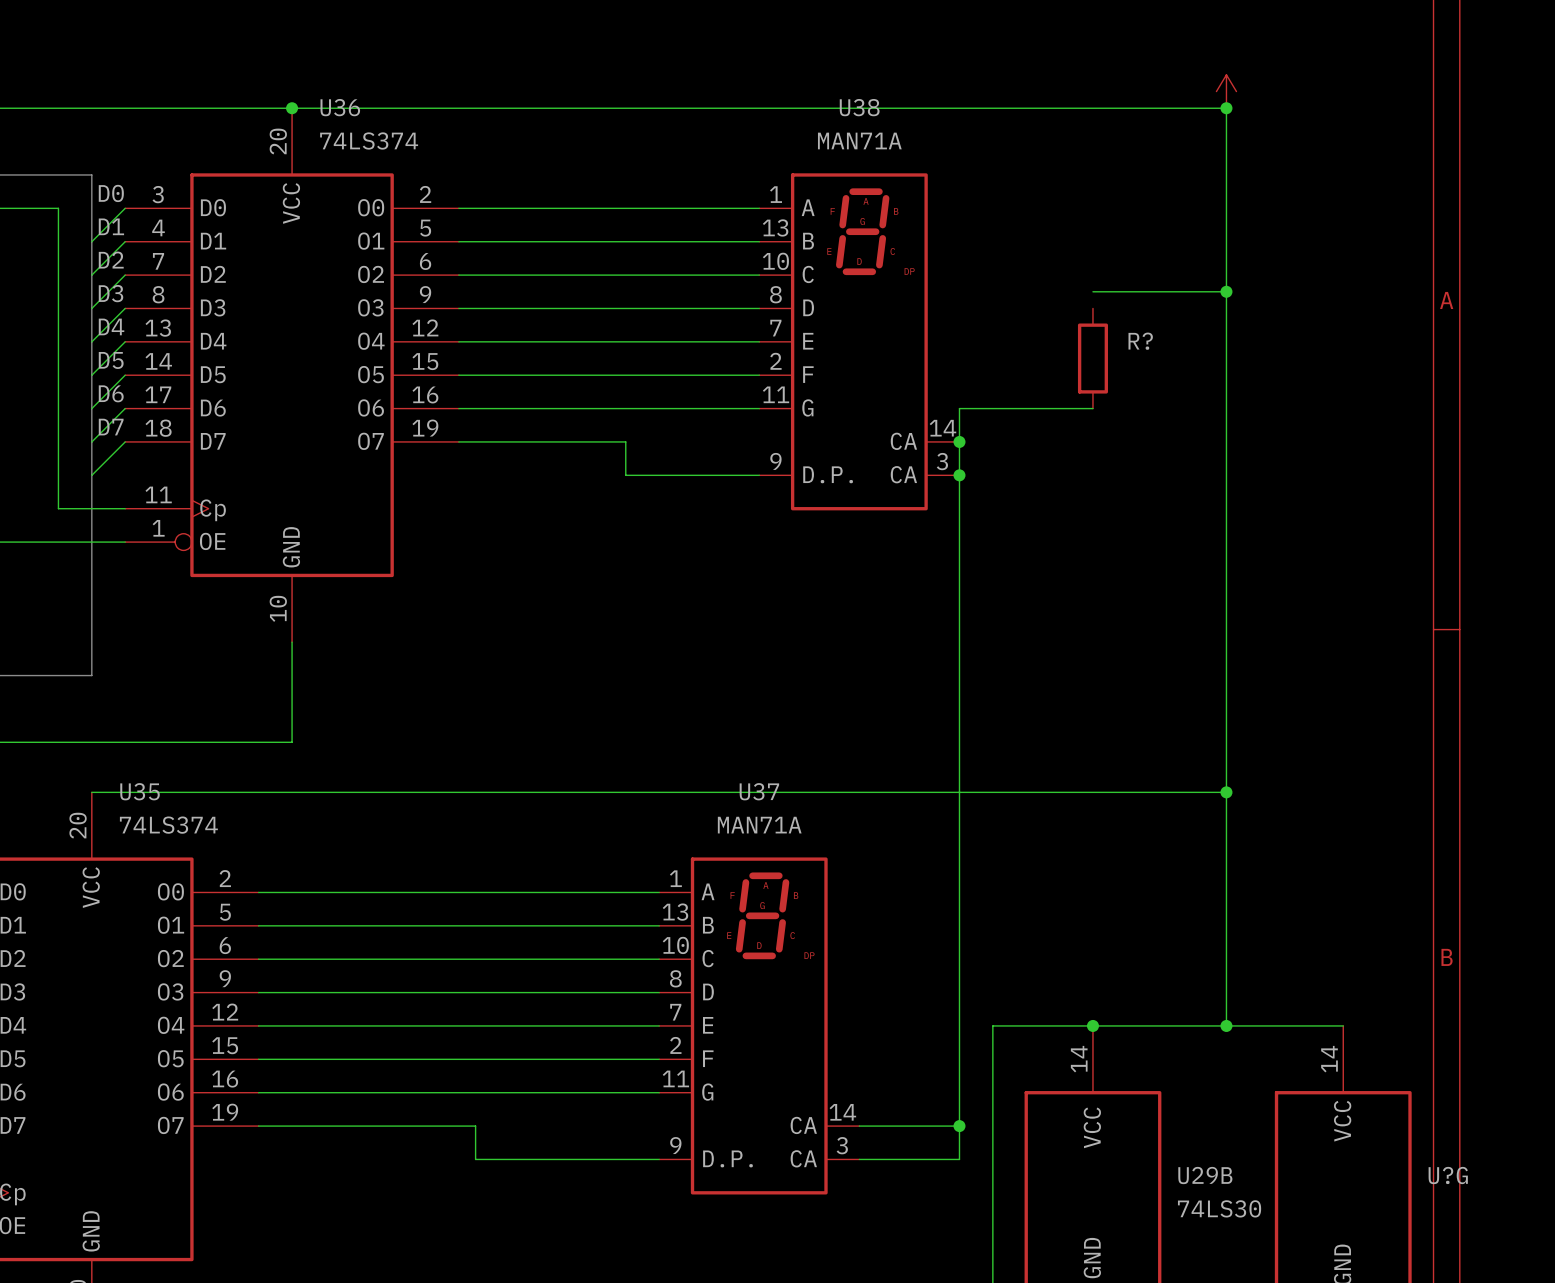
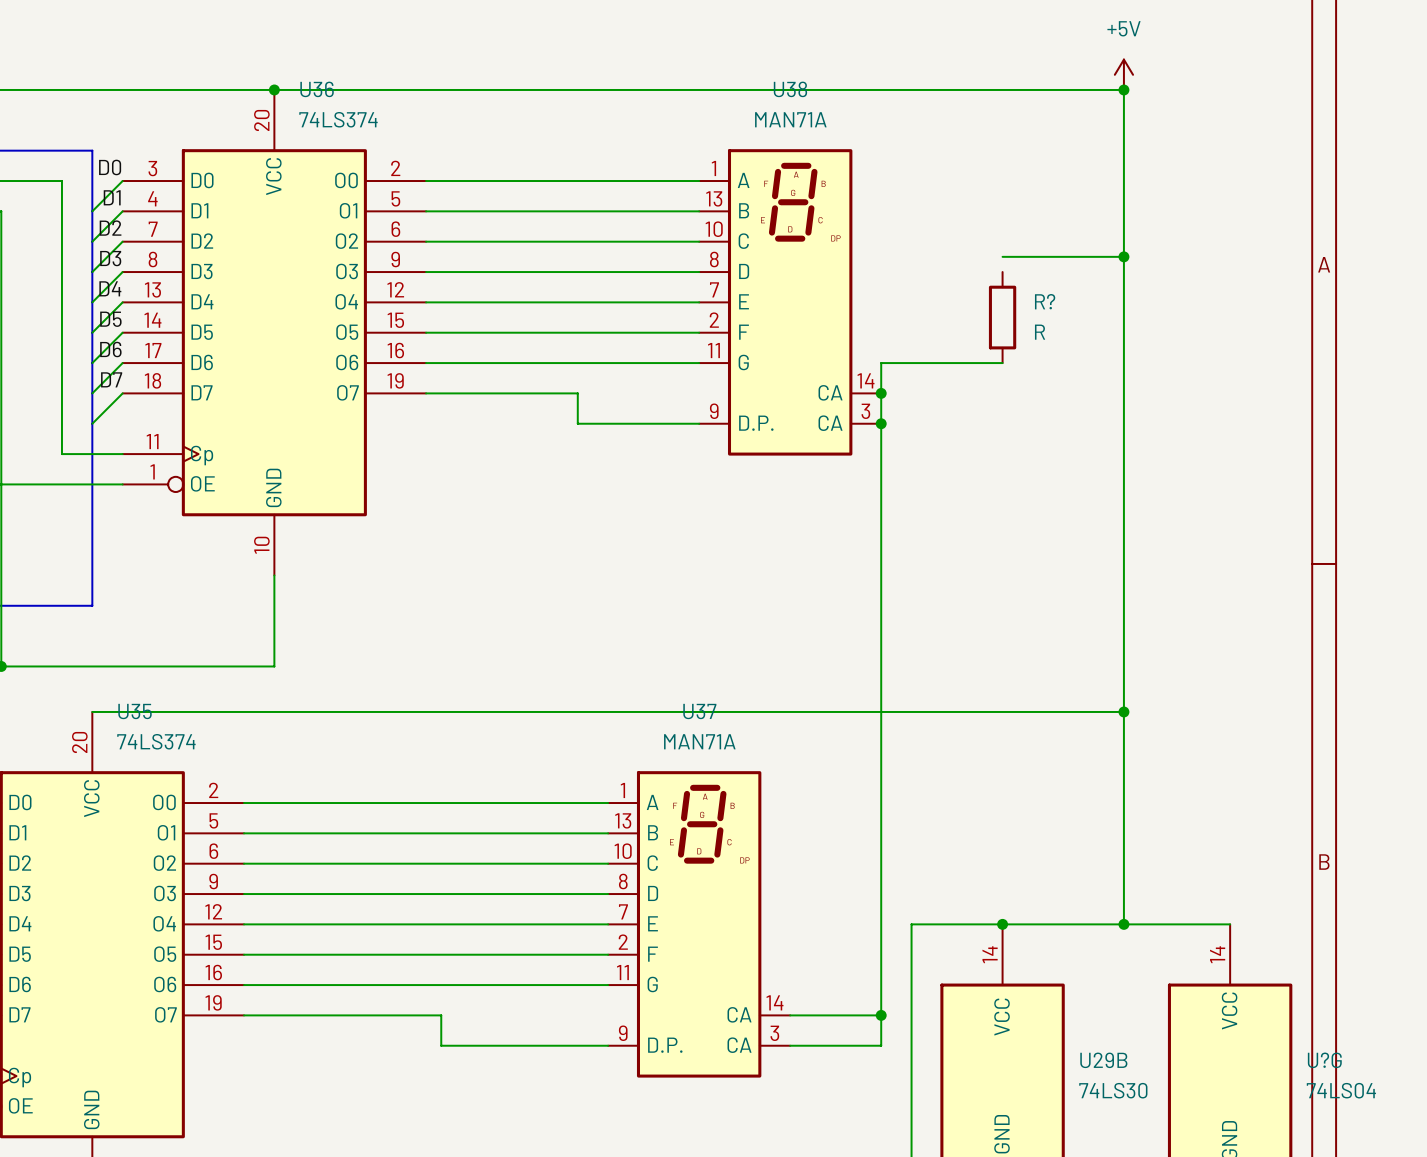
power symbol text: none -> +5V (1124, 28)
R? value: none -> R (1040, 332)
U?G value: none -> 74LS04 (1341, 1090)

